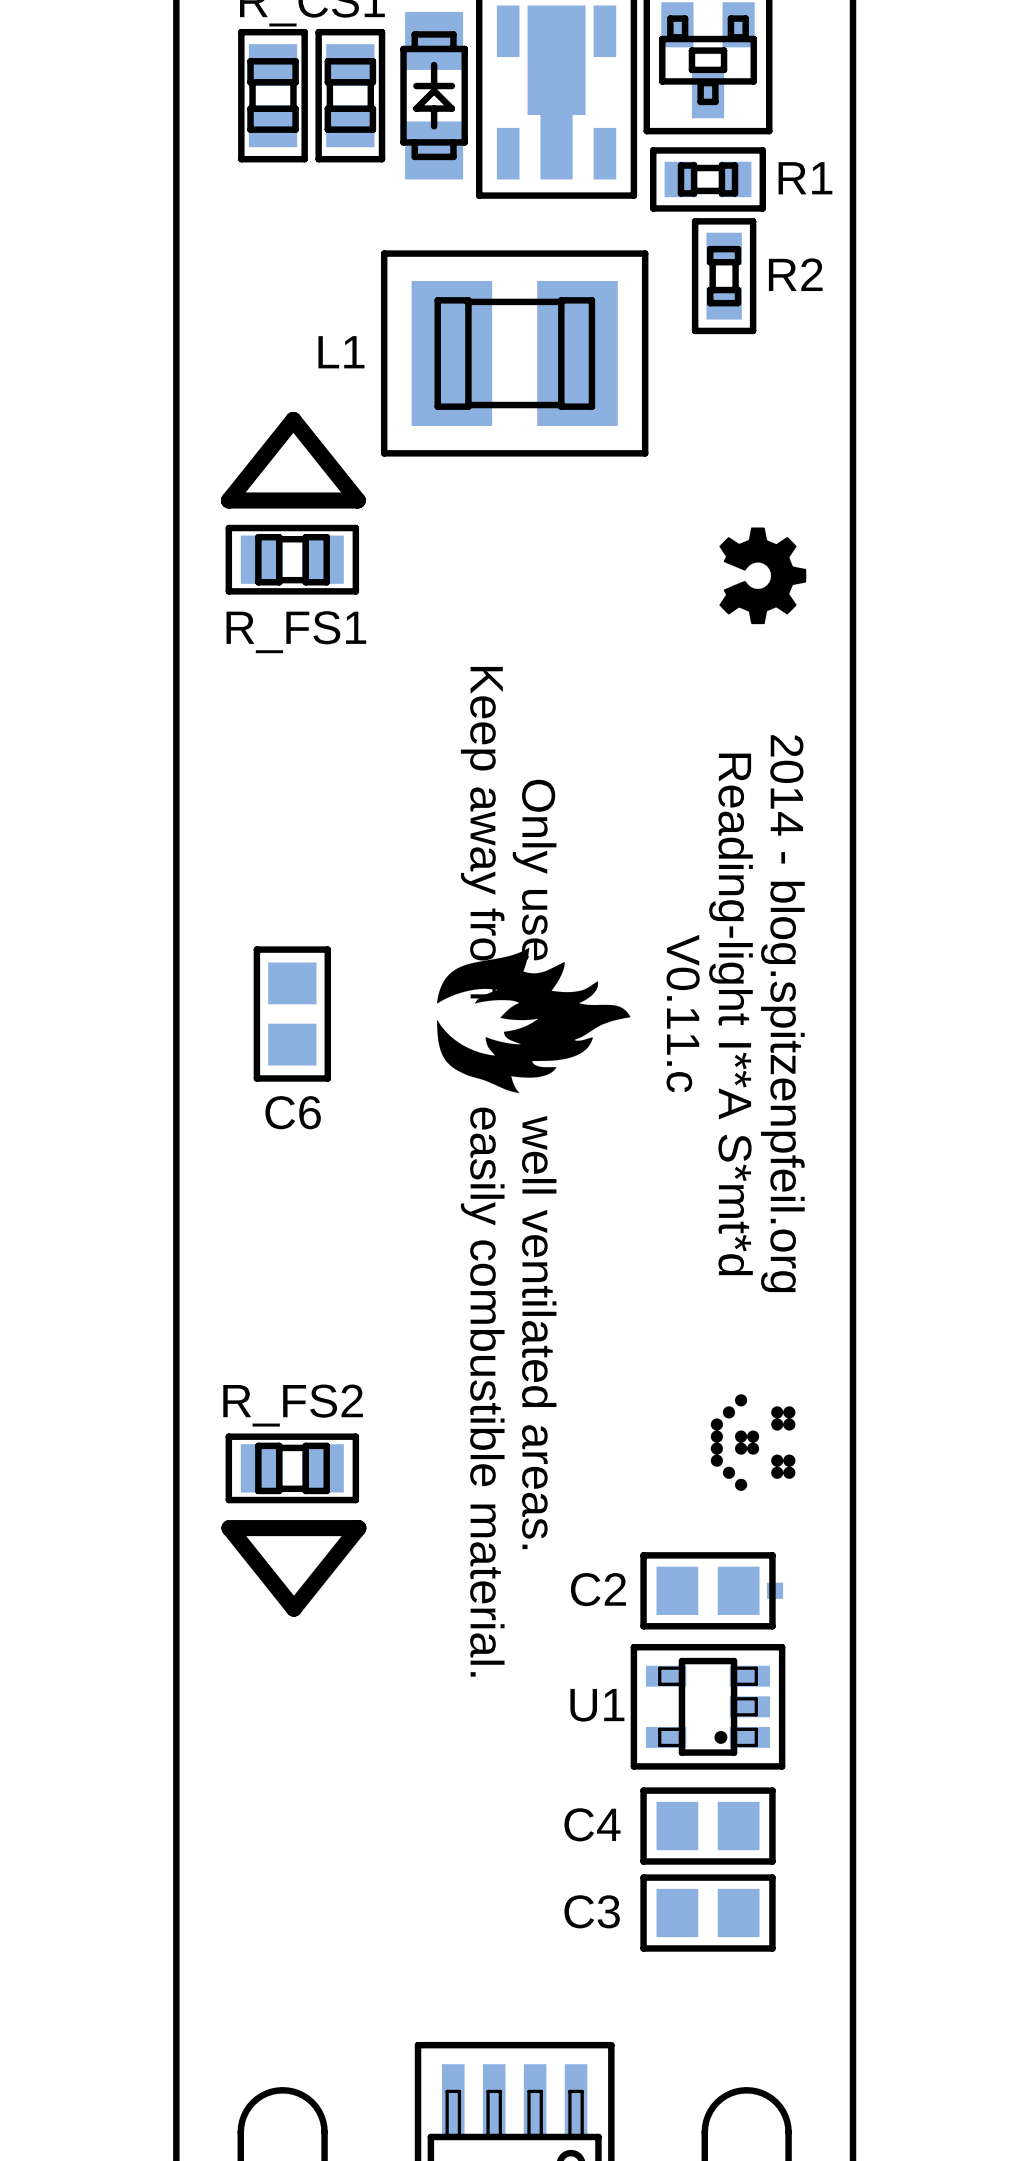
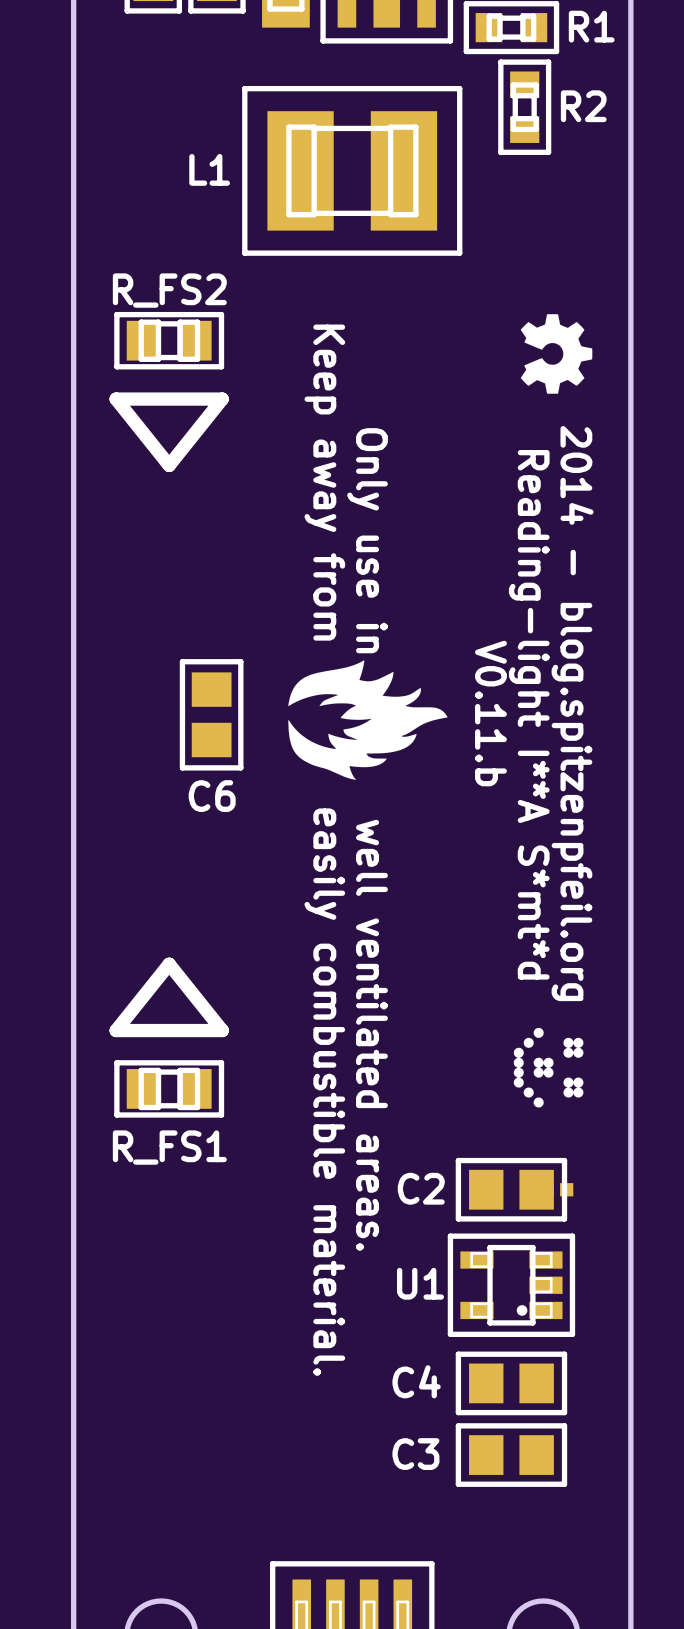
line: (293, 419) (228, 500) (357, 500) (293, 419) -> none
line: none -> (222, 399) (169, 465) (116, 399) (222, 399)
R_FS1 name: R_FS1 (296, 632) -> R_FS2 (169, 290)
text: V0.11.c (683, 1013) -> V0.11.b (490, 713)
C6 position: (292, 1014) -> (211, 714)
line: none -> (169, 964) (222, 1030) (116, 1030) (169, 964)
R_FS2 name: R_FS2 (293, 1405) -> R_FS1 (169, 1147)
line: (358, 1528) (293, 1608) (229, 1528) (358, 1528) -> none

